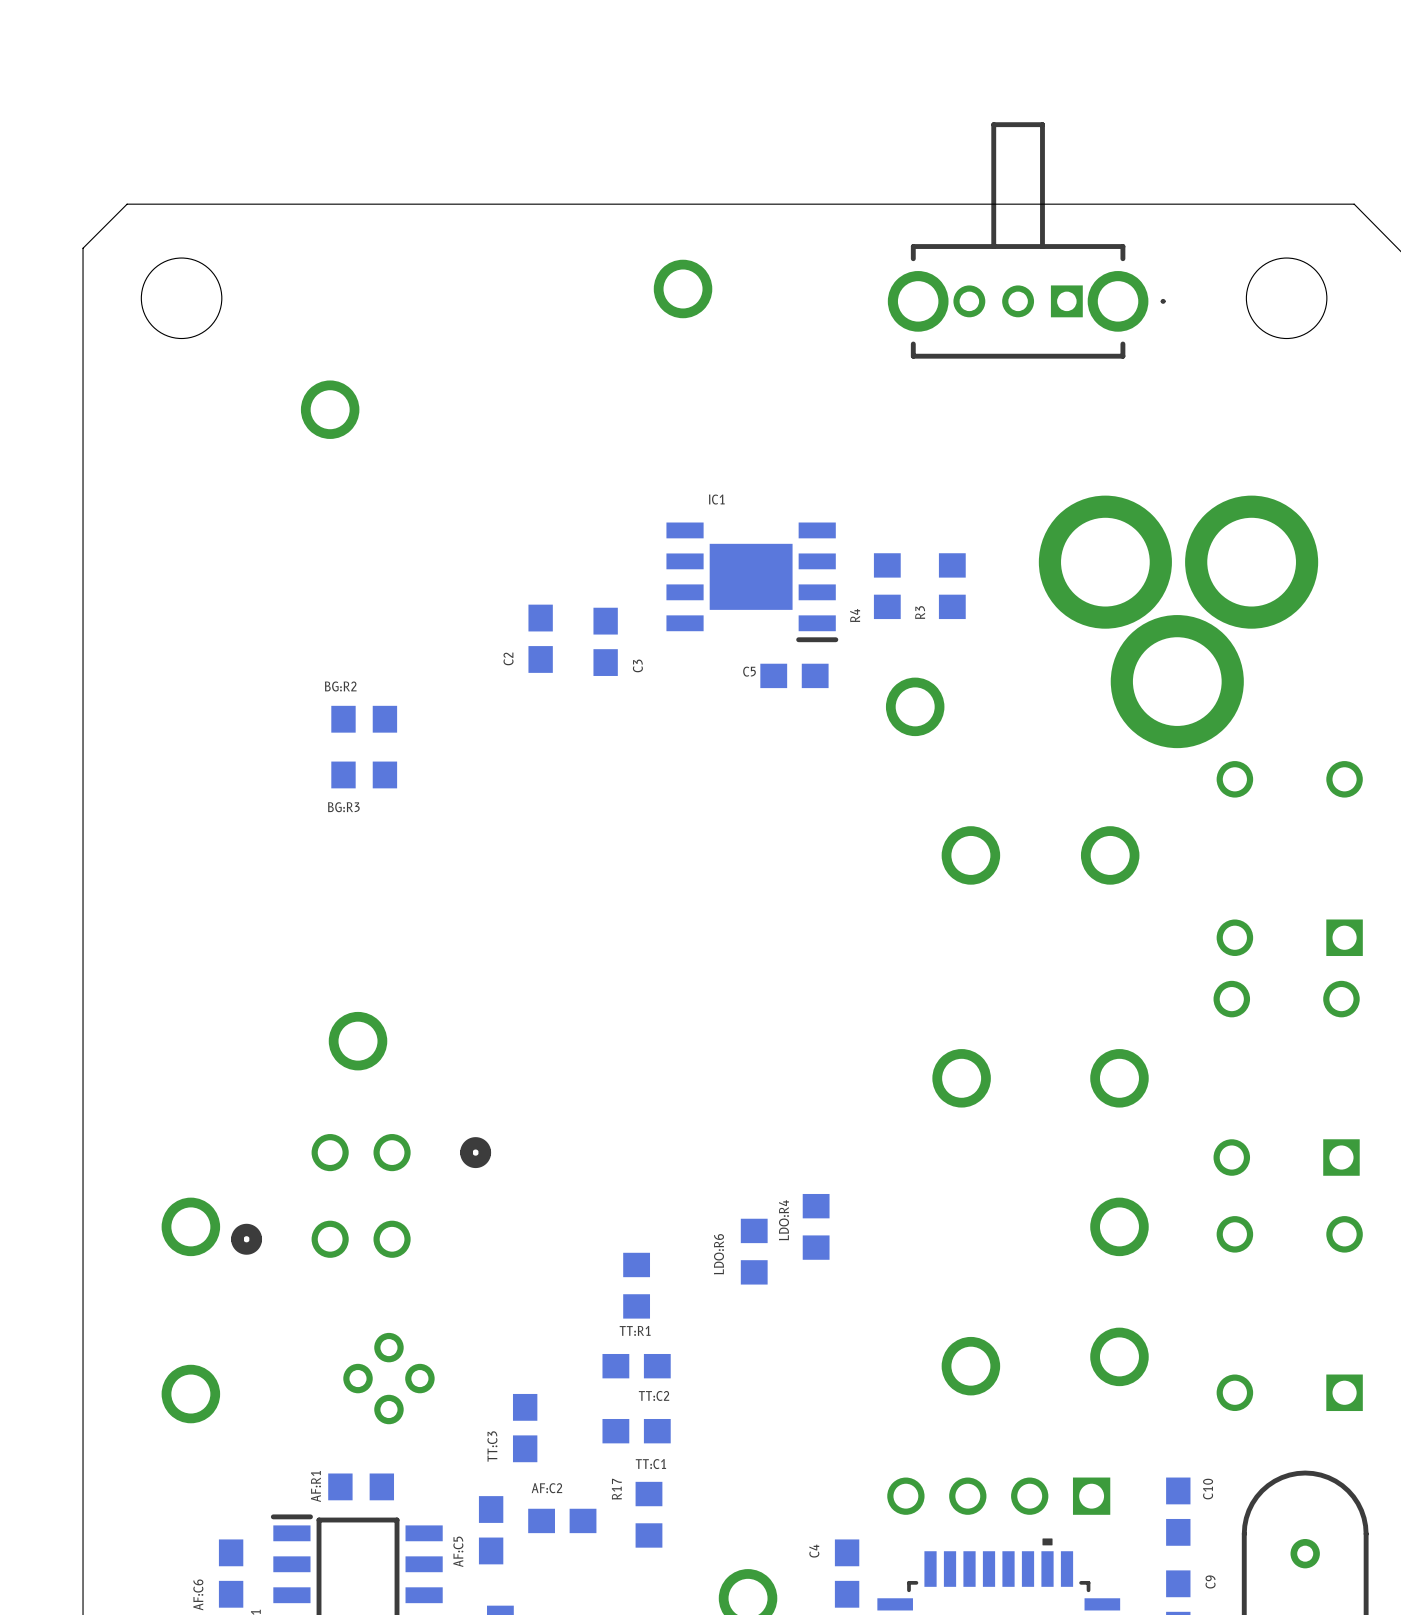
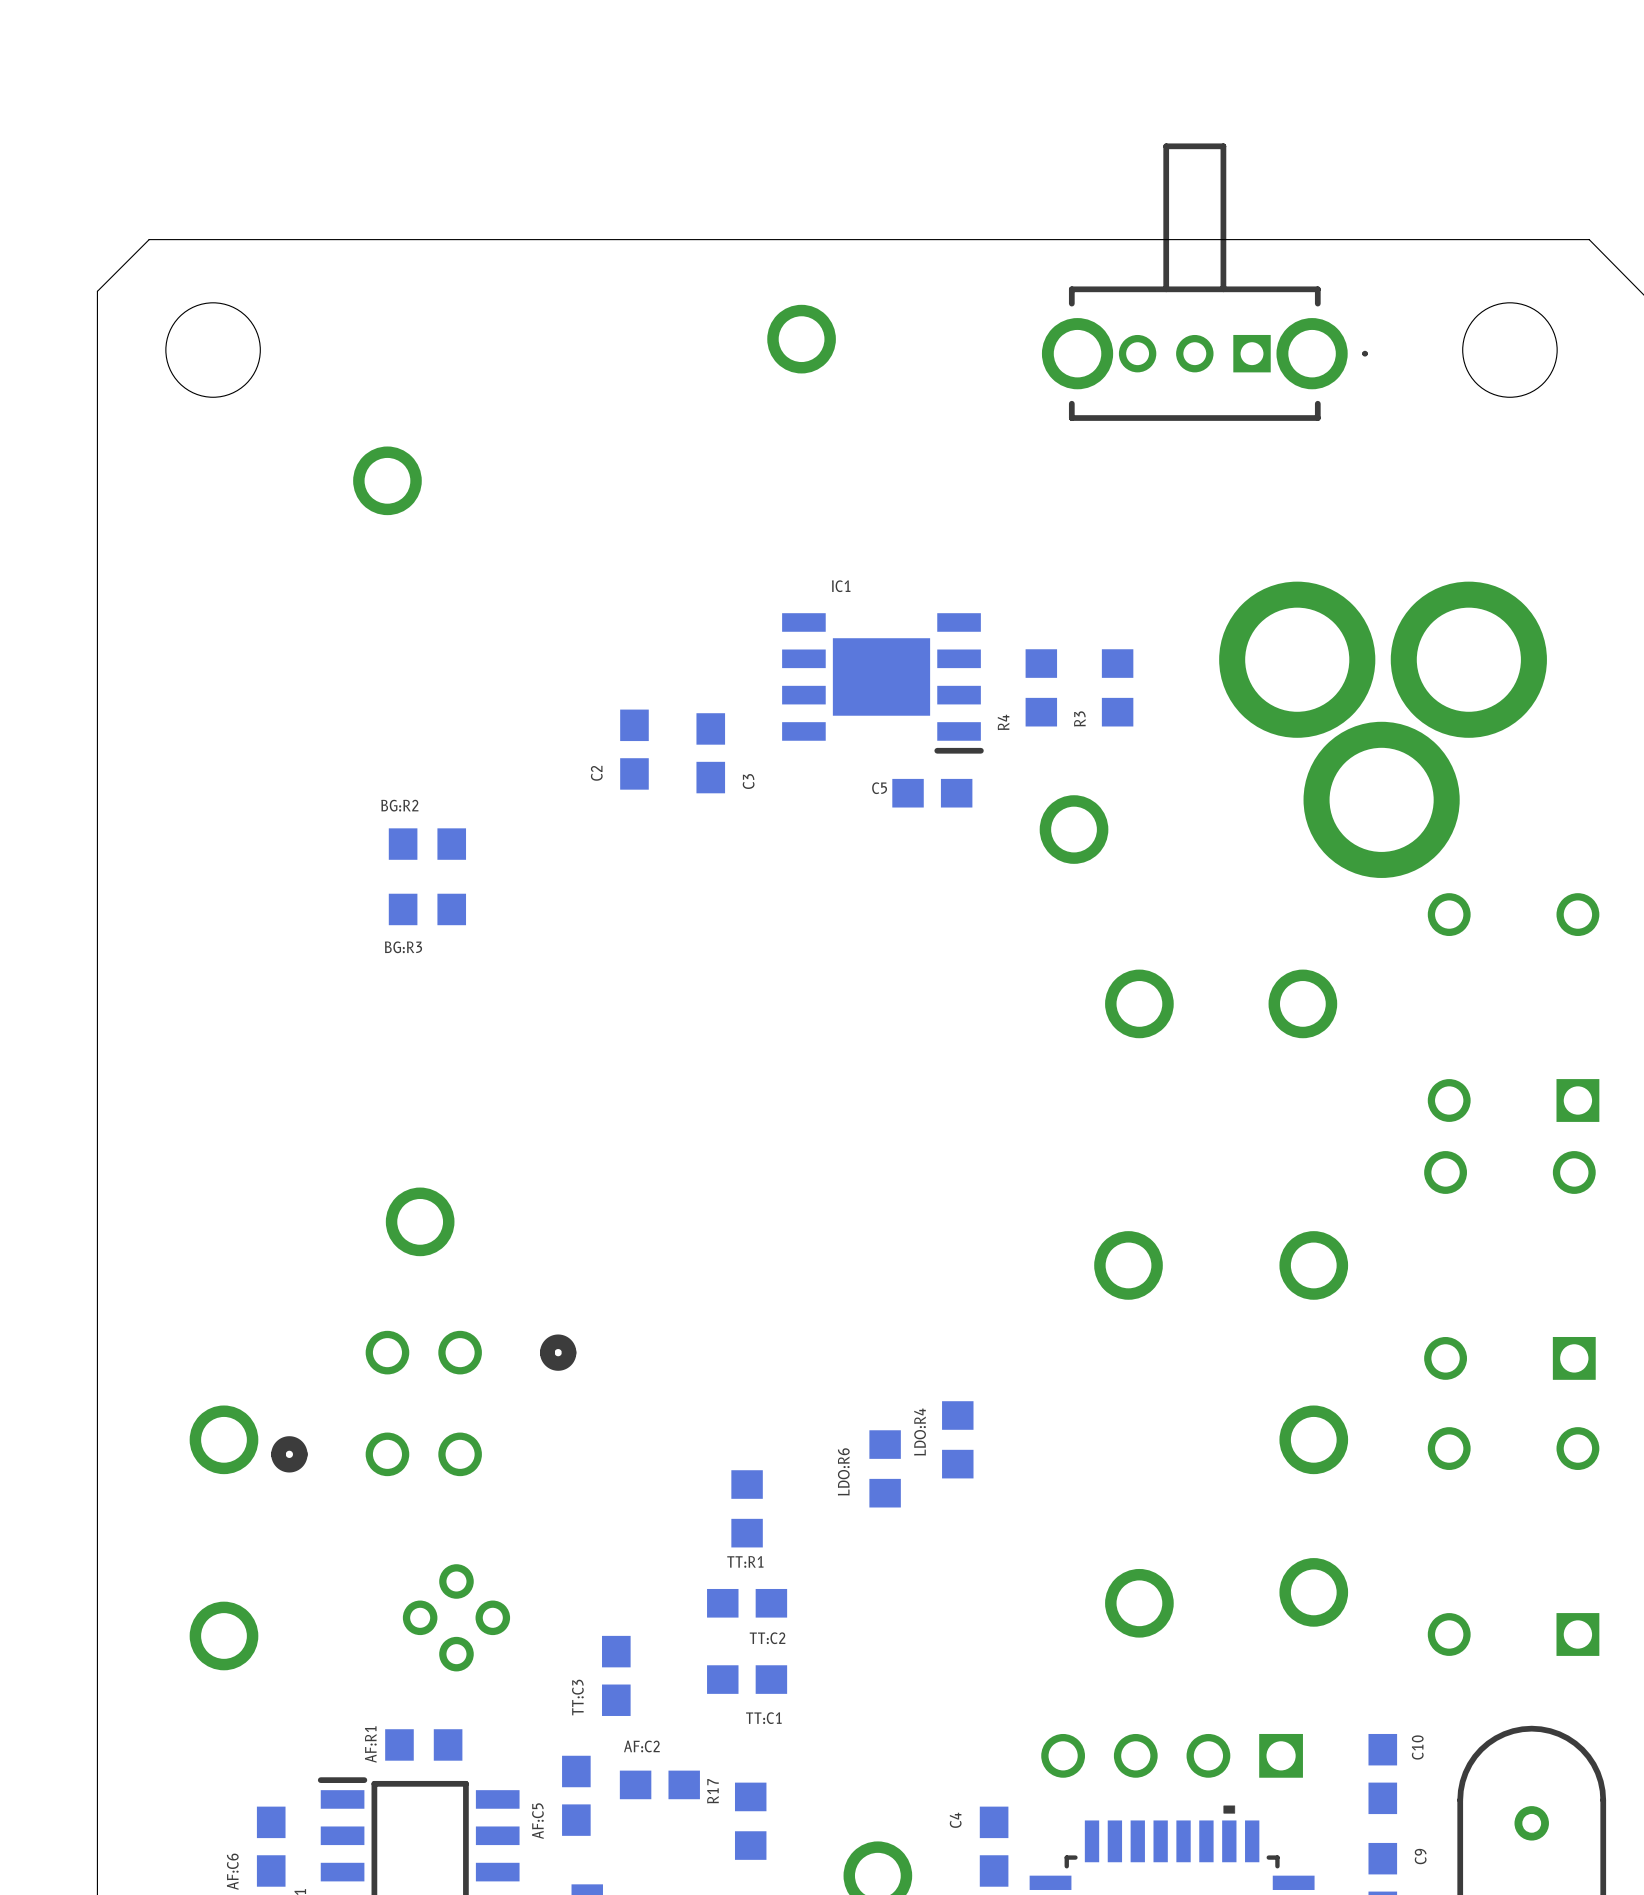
R17 position: (648, 1514) -> (750, 1821)

